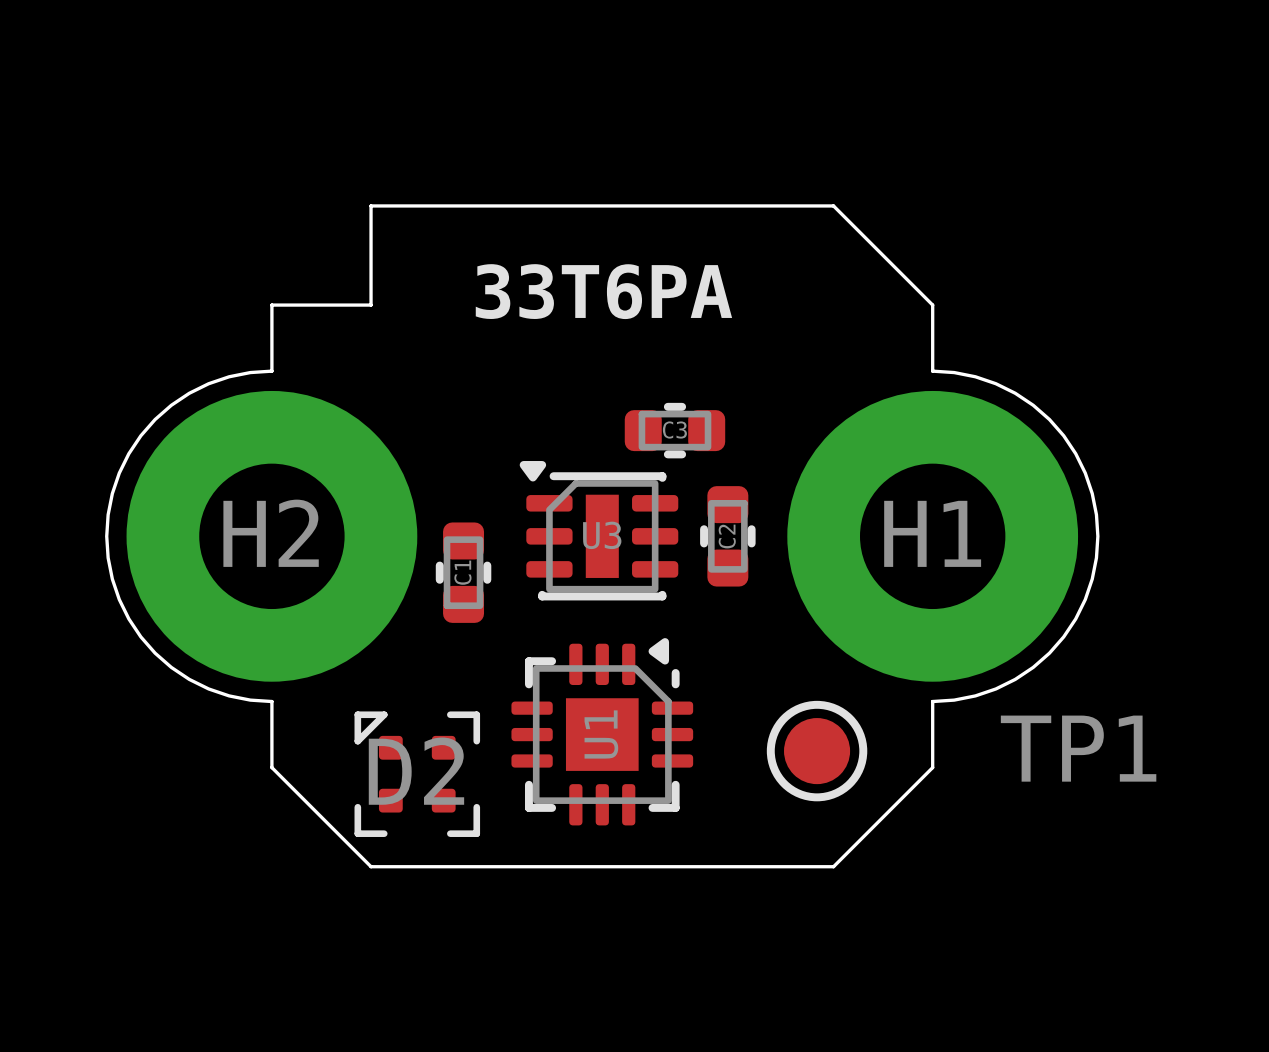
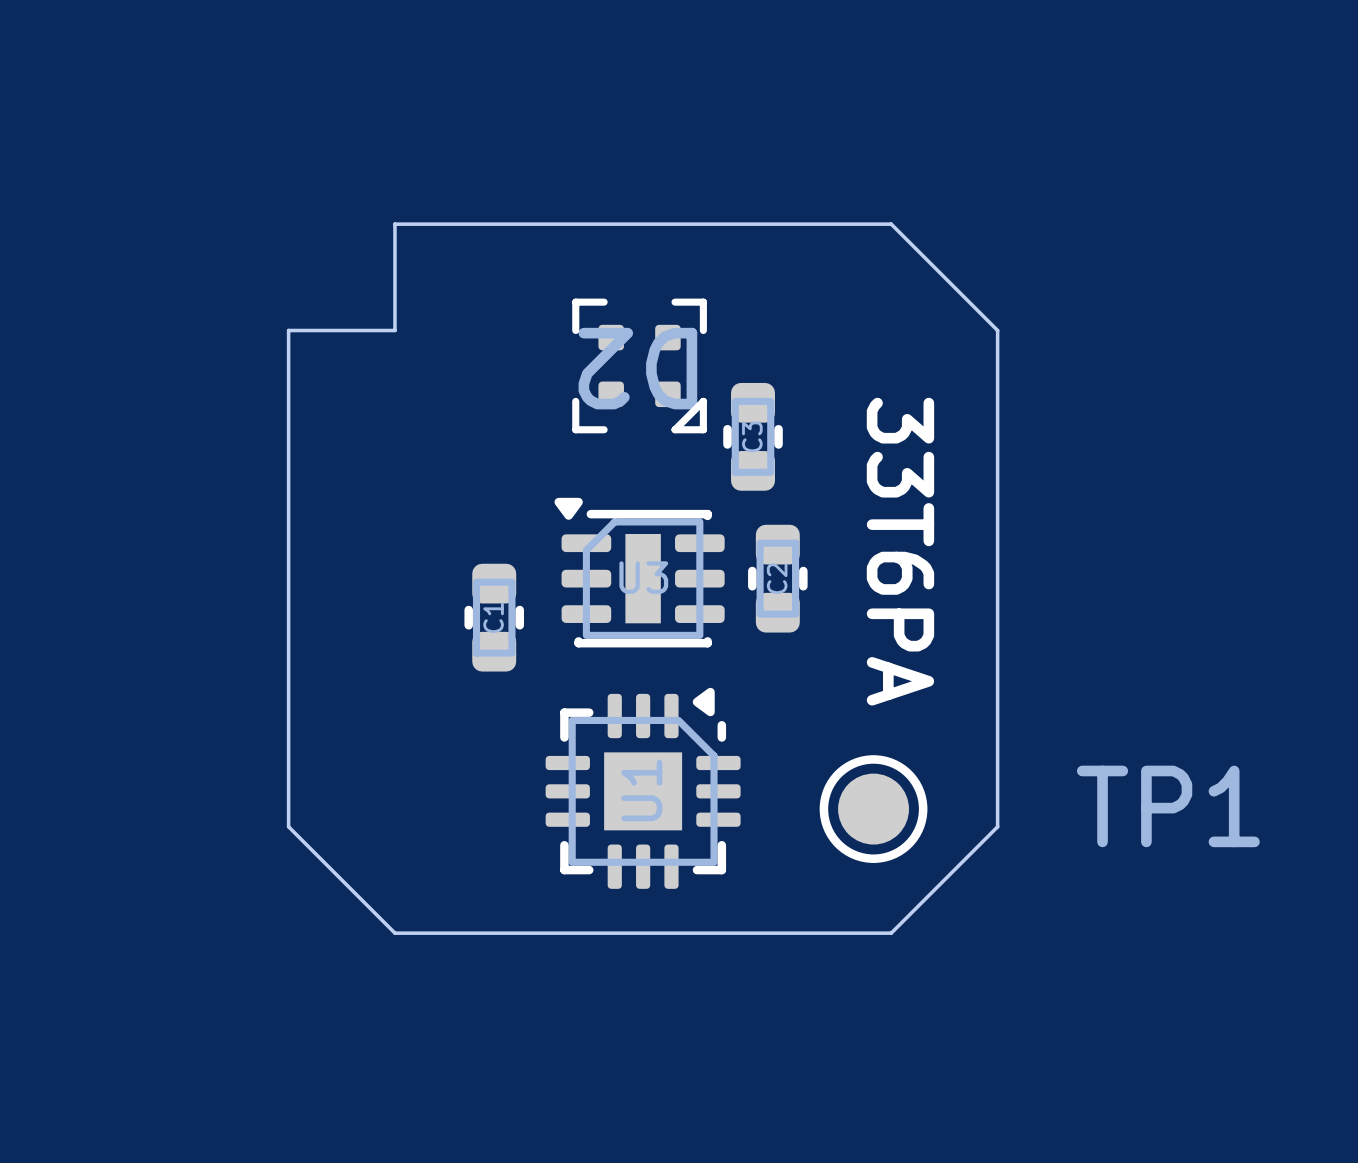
text rotation: 0° (603, 291) -> 90° clockwise (900, 551)
board edge: (271, 371) (229, 376) (208, 383) (189, 393) (155, 419) (128, 453) (119, 473) (112, 493) (106, 536) (112, 579) (119, 599) (128, 618) (155, 653) (189, 679) (208, 688) (229, 695) (271, 701) -> (288, 401) (288, 755)
board edge: (932, 371) (975, 376) (995, 383) (1015, 393) (1049, 419) (1075, 453) (1085, 473) (1092, 493) (1097, 536) (1092, 579) (1085, 599) (1075, 618) (1049, 653) (1015, 679) (995, 688) (975, 695) (932, 701) -> (997, 401) (997, 755)
C3 rotation: 0° (674, 430) -> 90° clockwise (753, 436)
H2: (271, 536) -> none
H1: (932, 536) -> none
D2 rotation: 0° (417, 774) -> 180° (639, 365)
D2 position: (417, 774) -> (639, 365)

